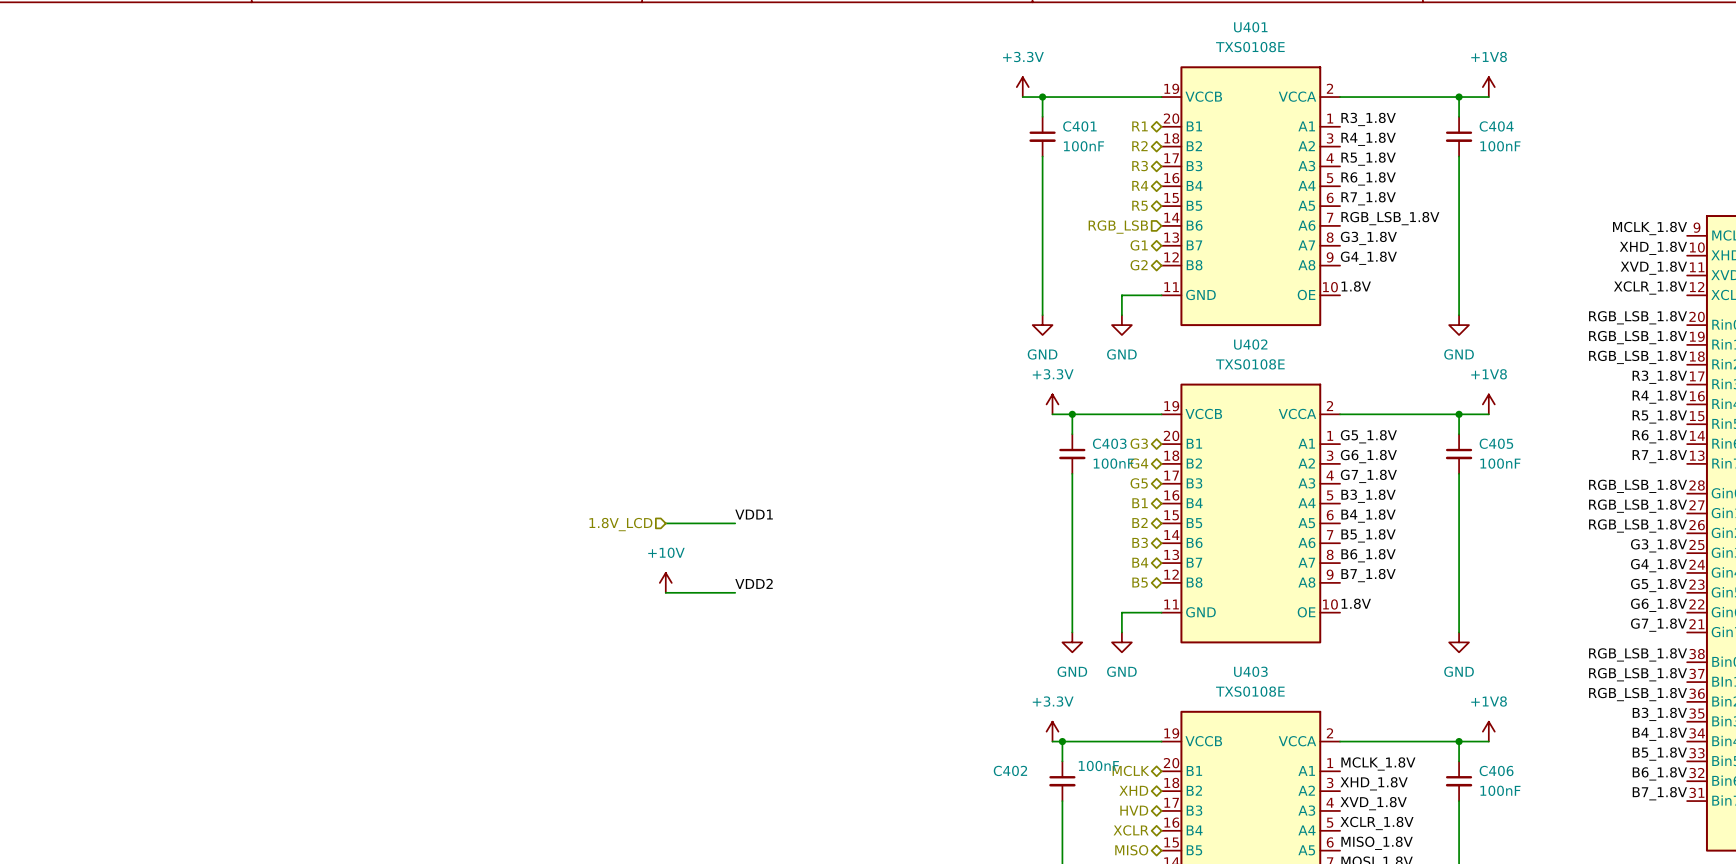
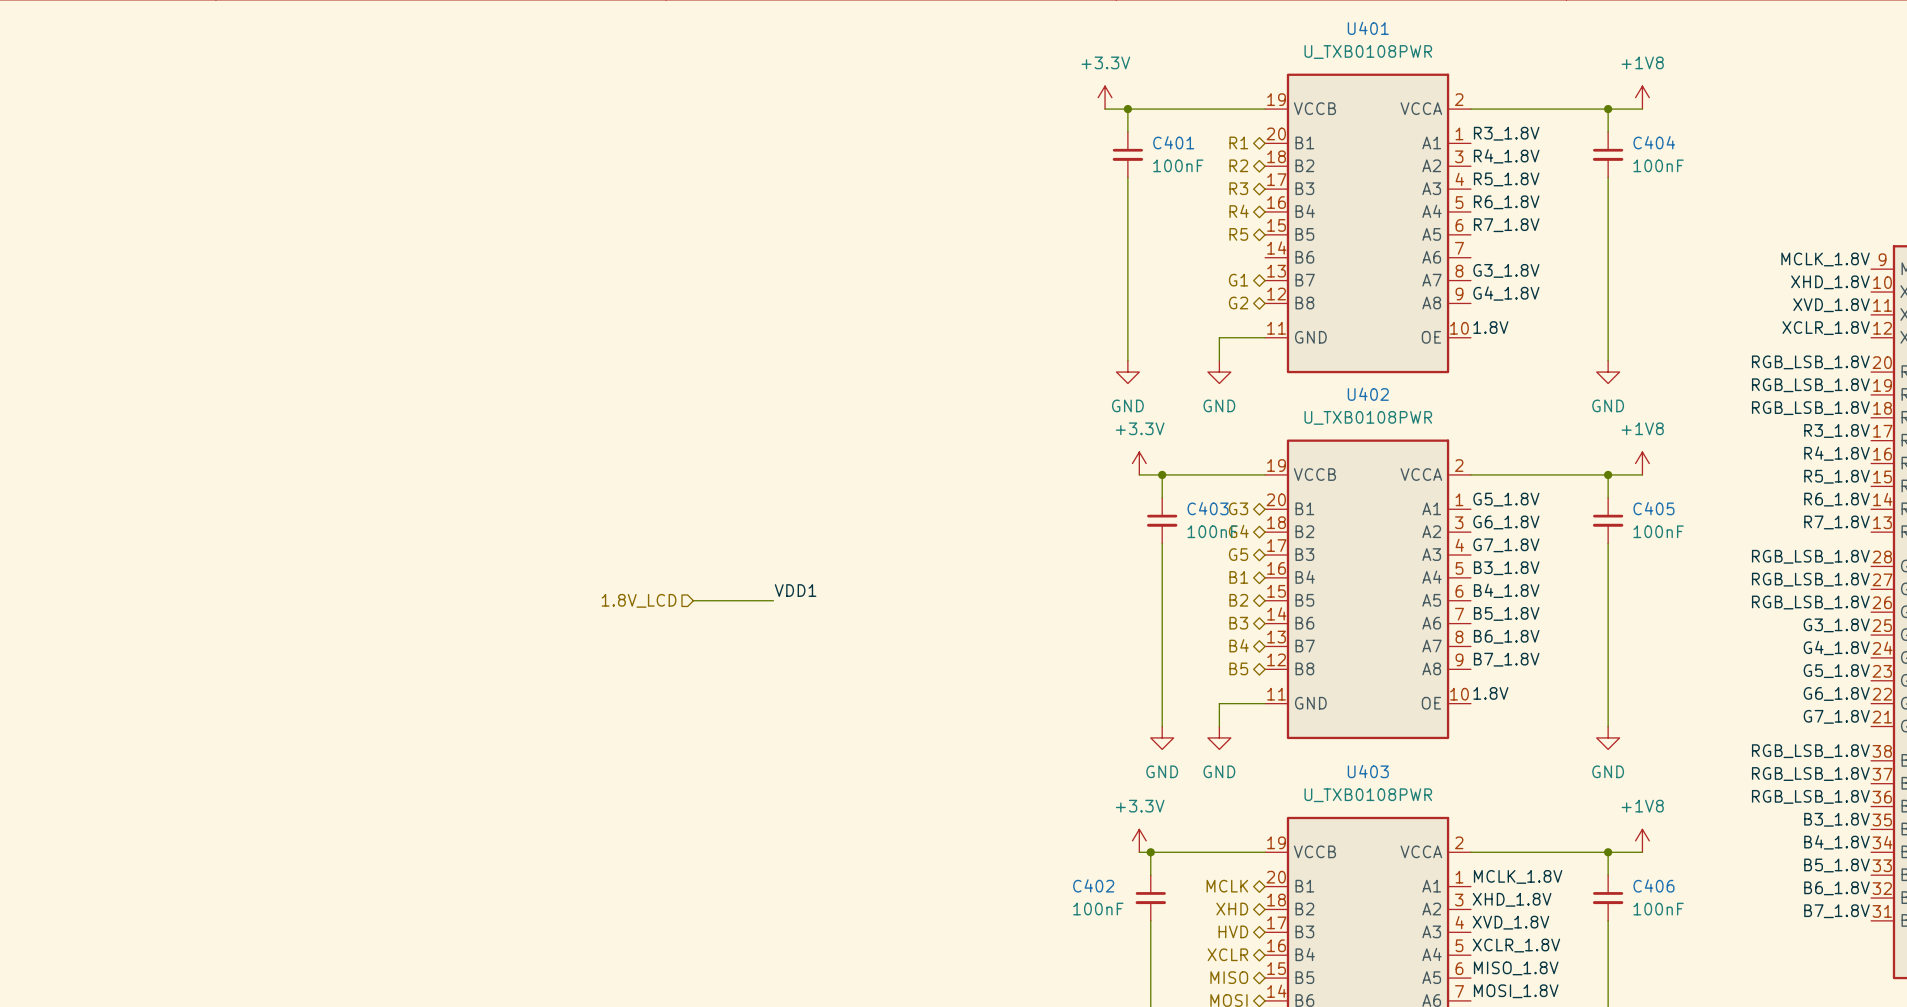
U401 text: TXS0108E (1250, 47) -> U_TXB0108PWR (1368, 52)
label: RGB_LSB_1.8V (1390, 218) -> none
hierarchical label: RGB_LSB (1118, 227) -> none
U402 text: TXS0108E (1250, 364) -> U_TXB0108PWR (1368, 417)
power symbol: +10V (665, 582) -> none
label: VDD2 (754, 583) -> none
wire: (665, 592) (735, 592) -> none
U403 text: TXS0108E (1250, 691) -> U_TXB0108PWR (1368, 795)
C402 text position: 100nF (1098, 765) -> 100nF (1098, 909)

